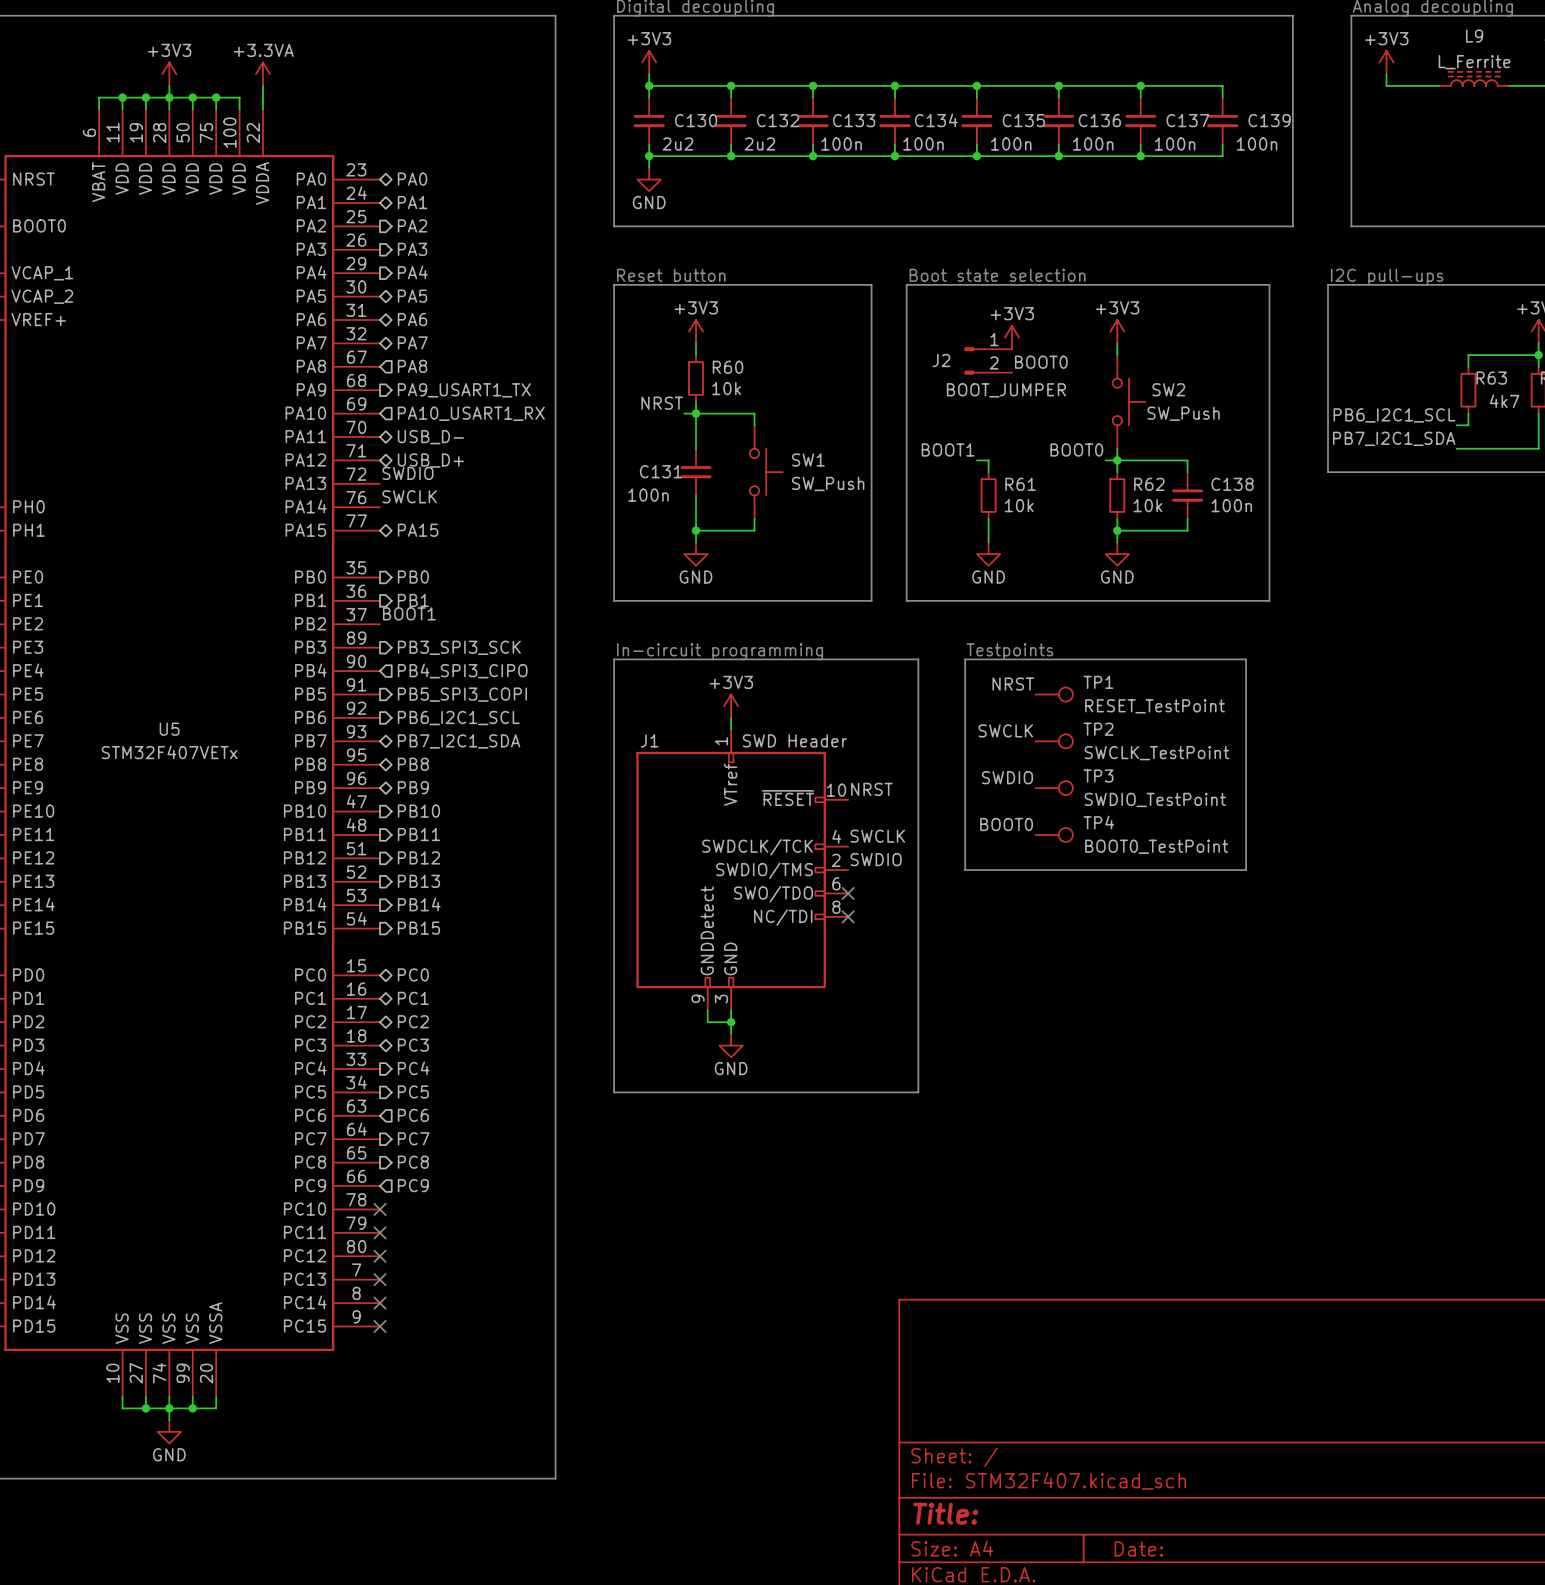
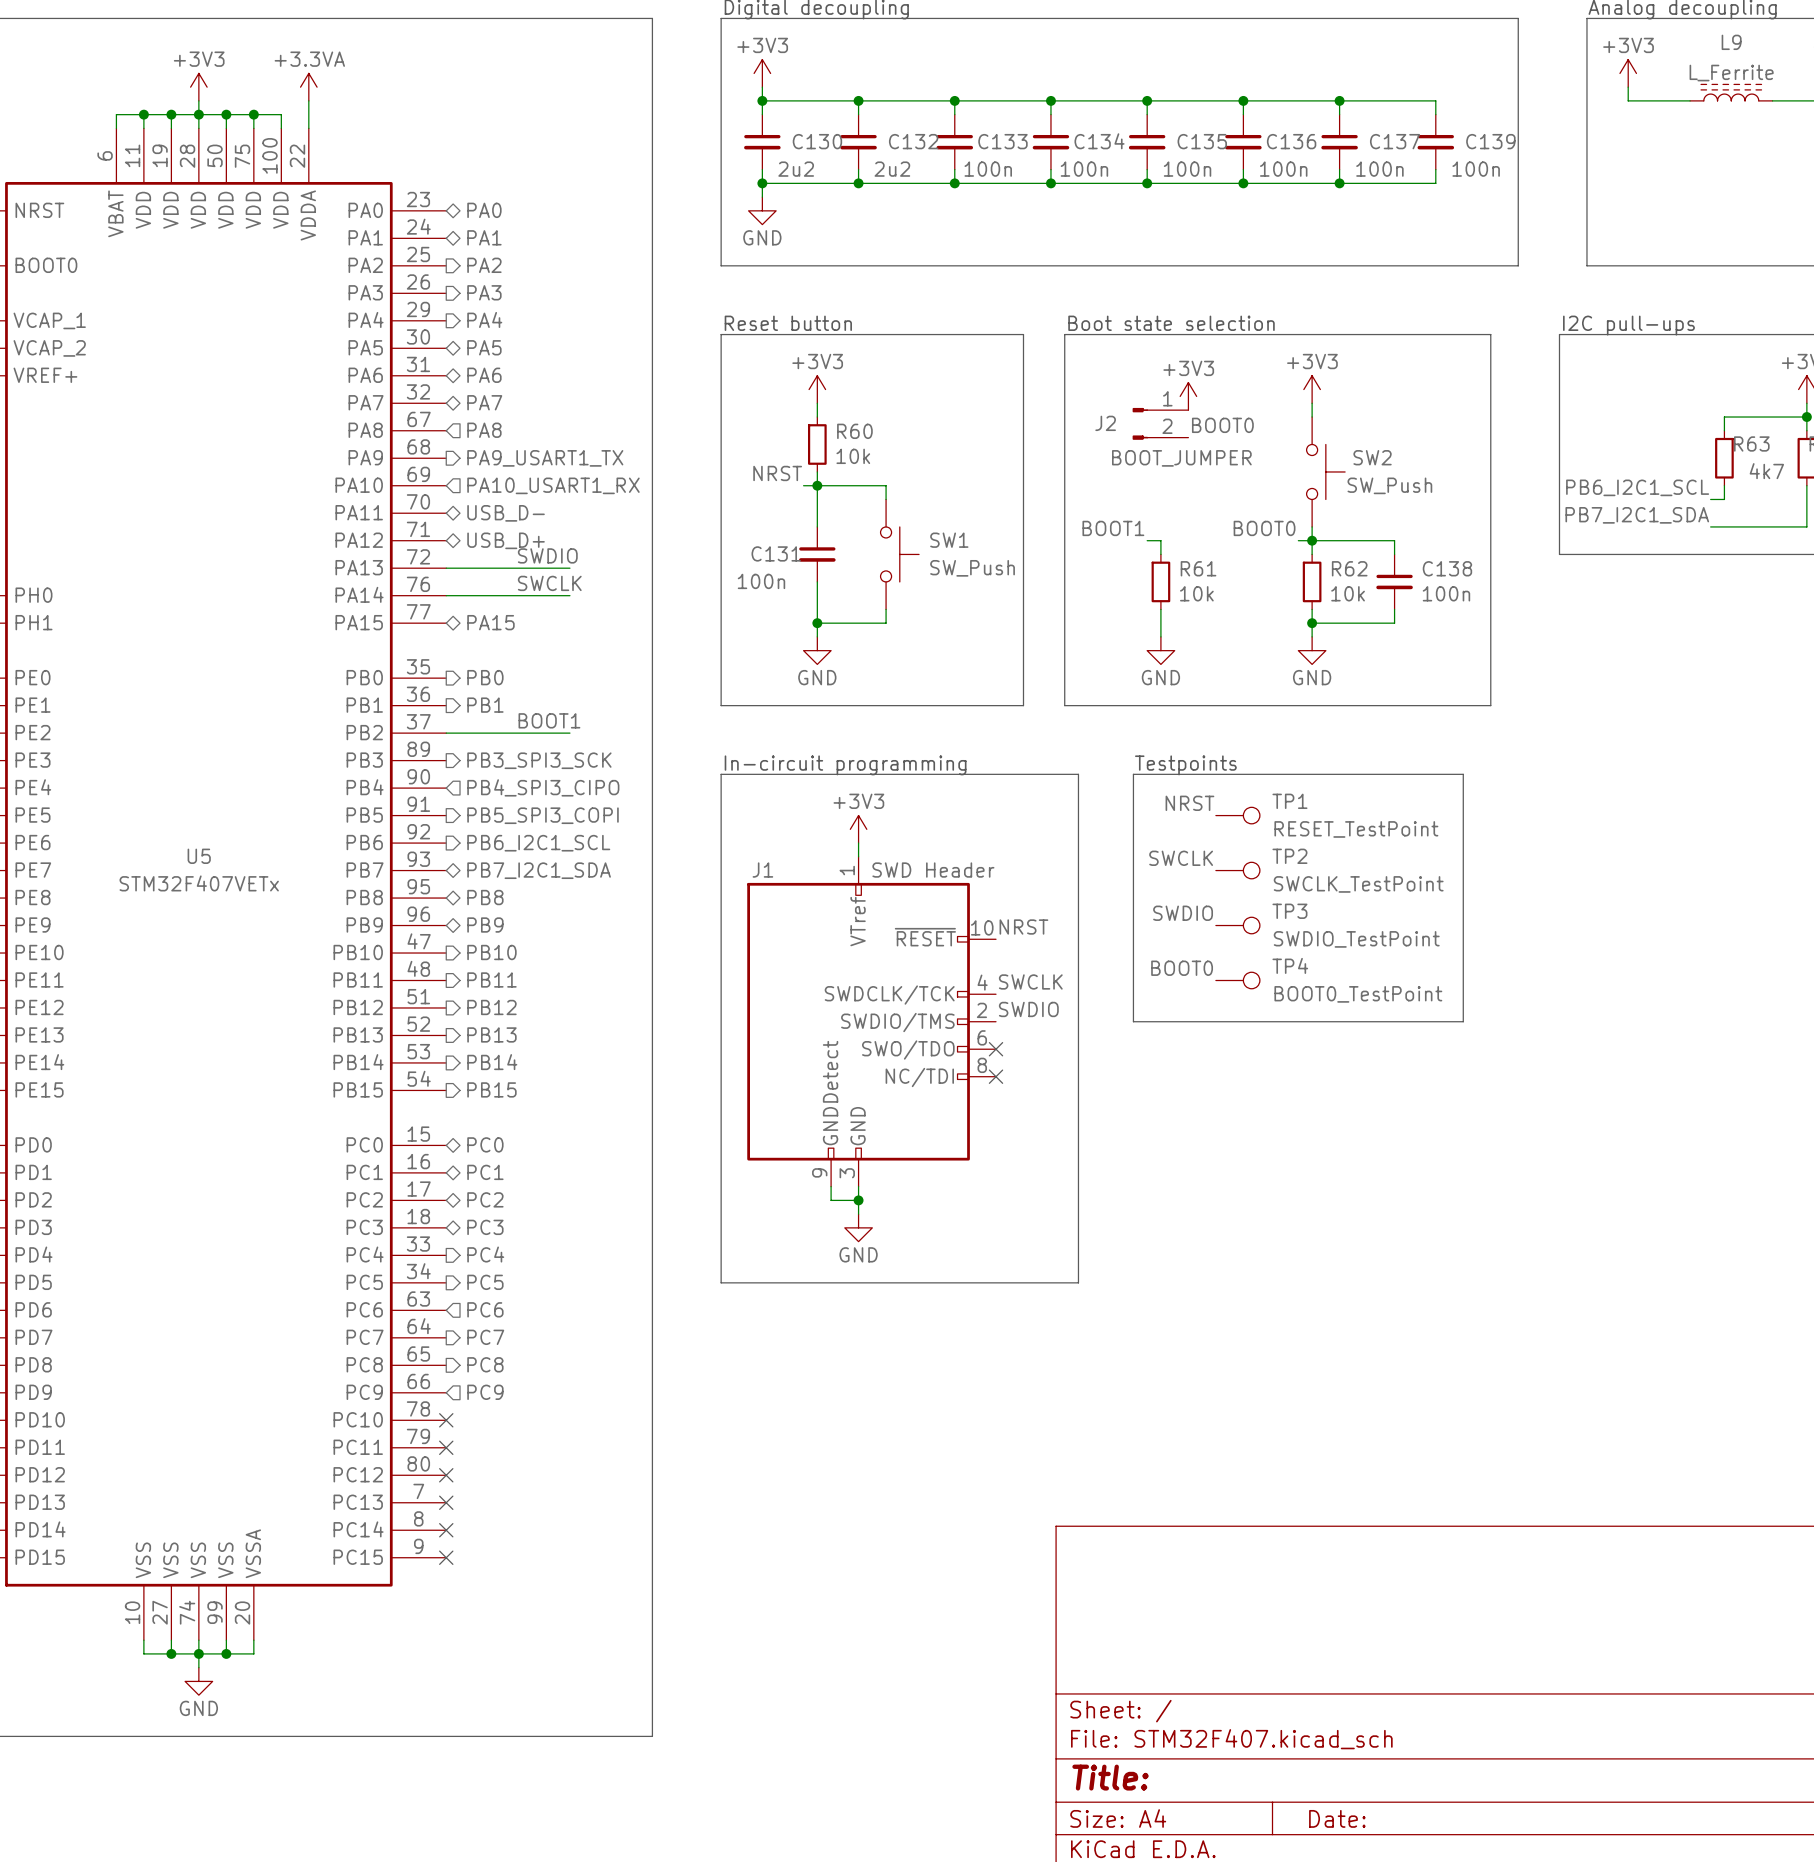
label position: SWDIO (407, 473) -> SWDIO (547, 555)
wire: none -> (446, 568) (569, 568)
label position: SWCLK (409, 496) -> SWCLK (549, 583)
wire: none -> (446, 595) (569, 595)
label position: BOOT1 (409, 613) -> BOOT1 (549, 720)
wire: none -> (446, 733) (569, 733)

